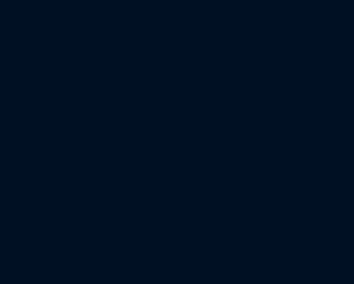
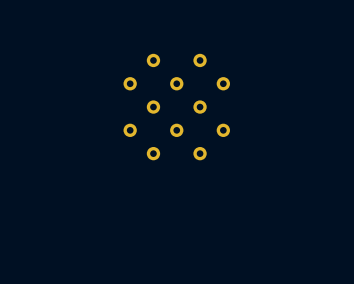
part: none -> (176, 107)

